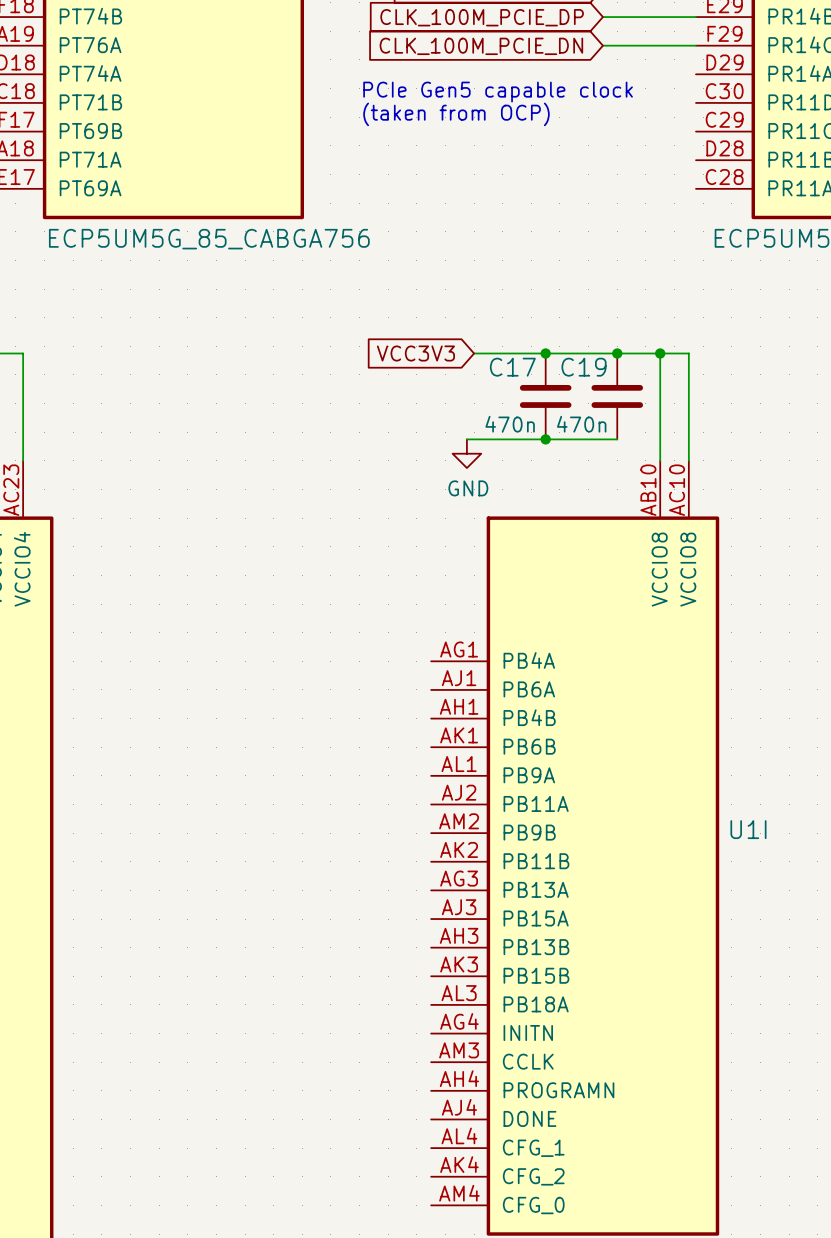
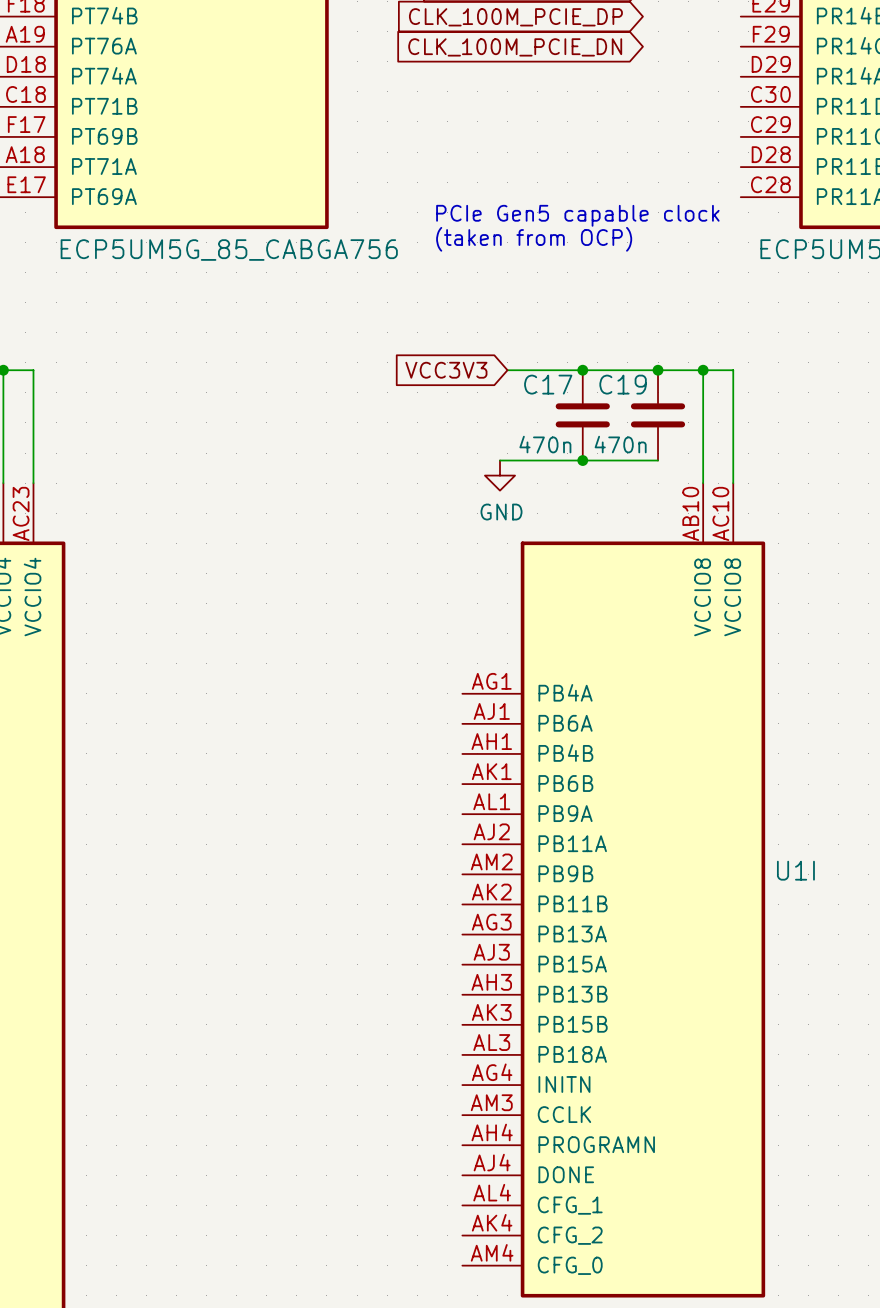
wire: (602, 17) (696, 17) -> none
wire: (602, 45) (696, 45) -> none
text position: PCIe Gen5 capable clock (498, 92) -> PCIe Gen5 capable clock (577, 215)
text position: (taken from OCP) (456, 114) -> (taken from OCP) (534, 239)

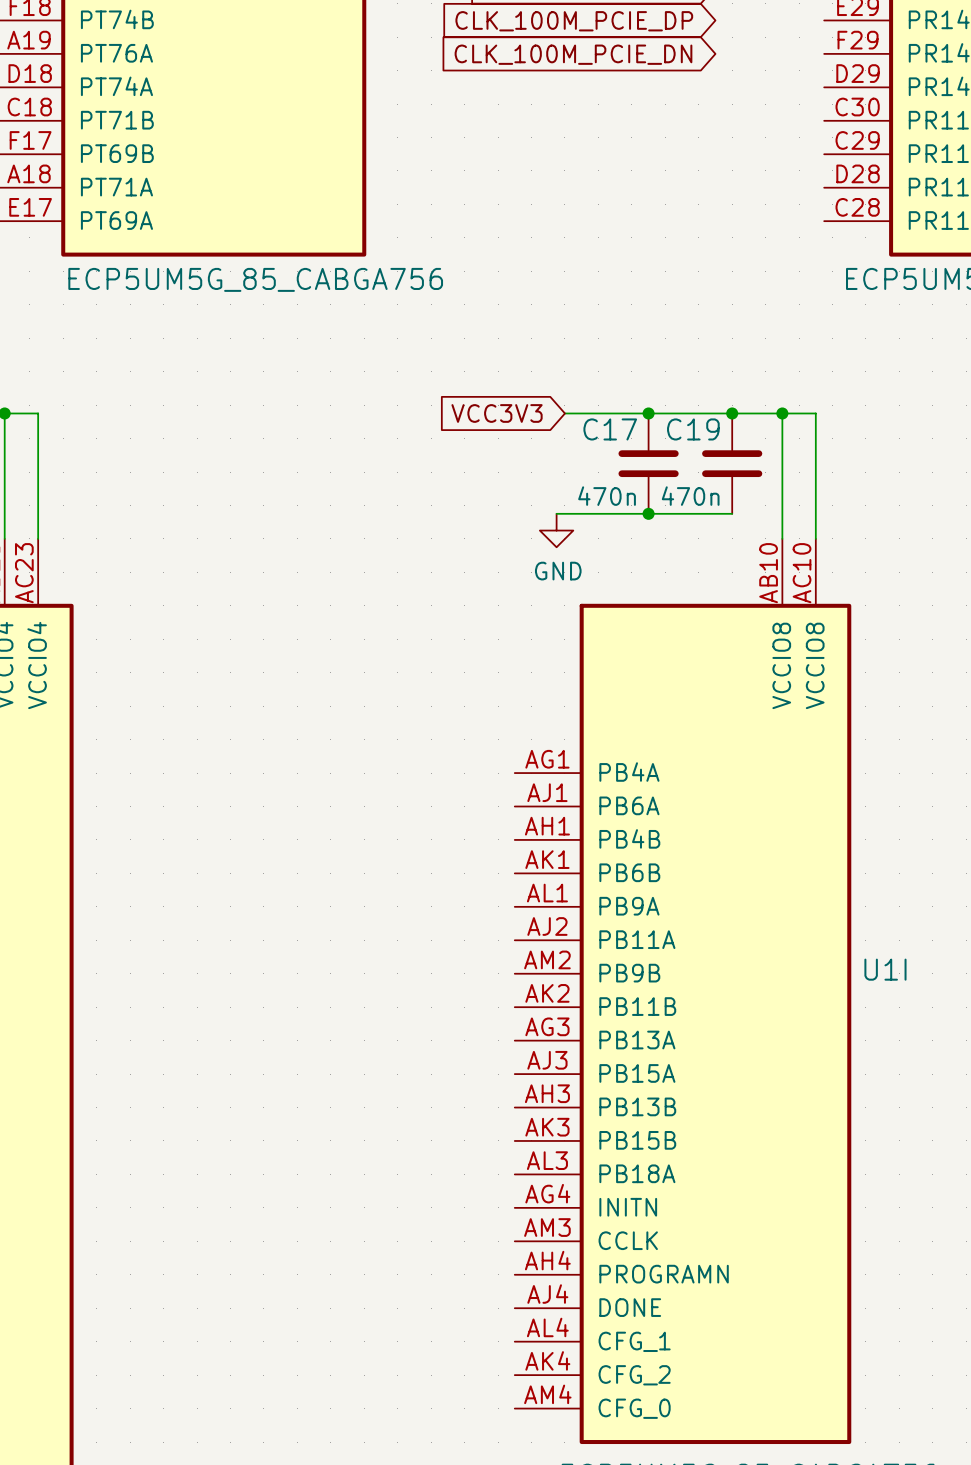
text: PCIe Gen5 capable clock (577, 215) -> none
text: (taken from OCP) (534, 239) -> none

